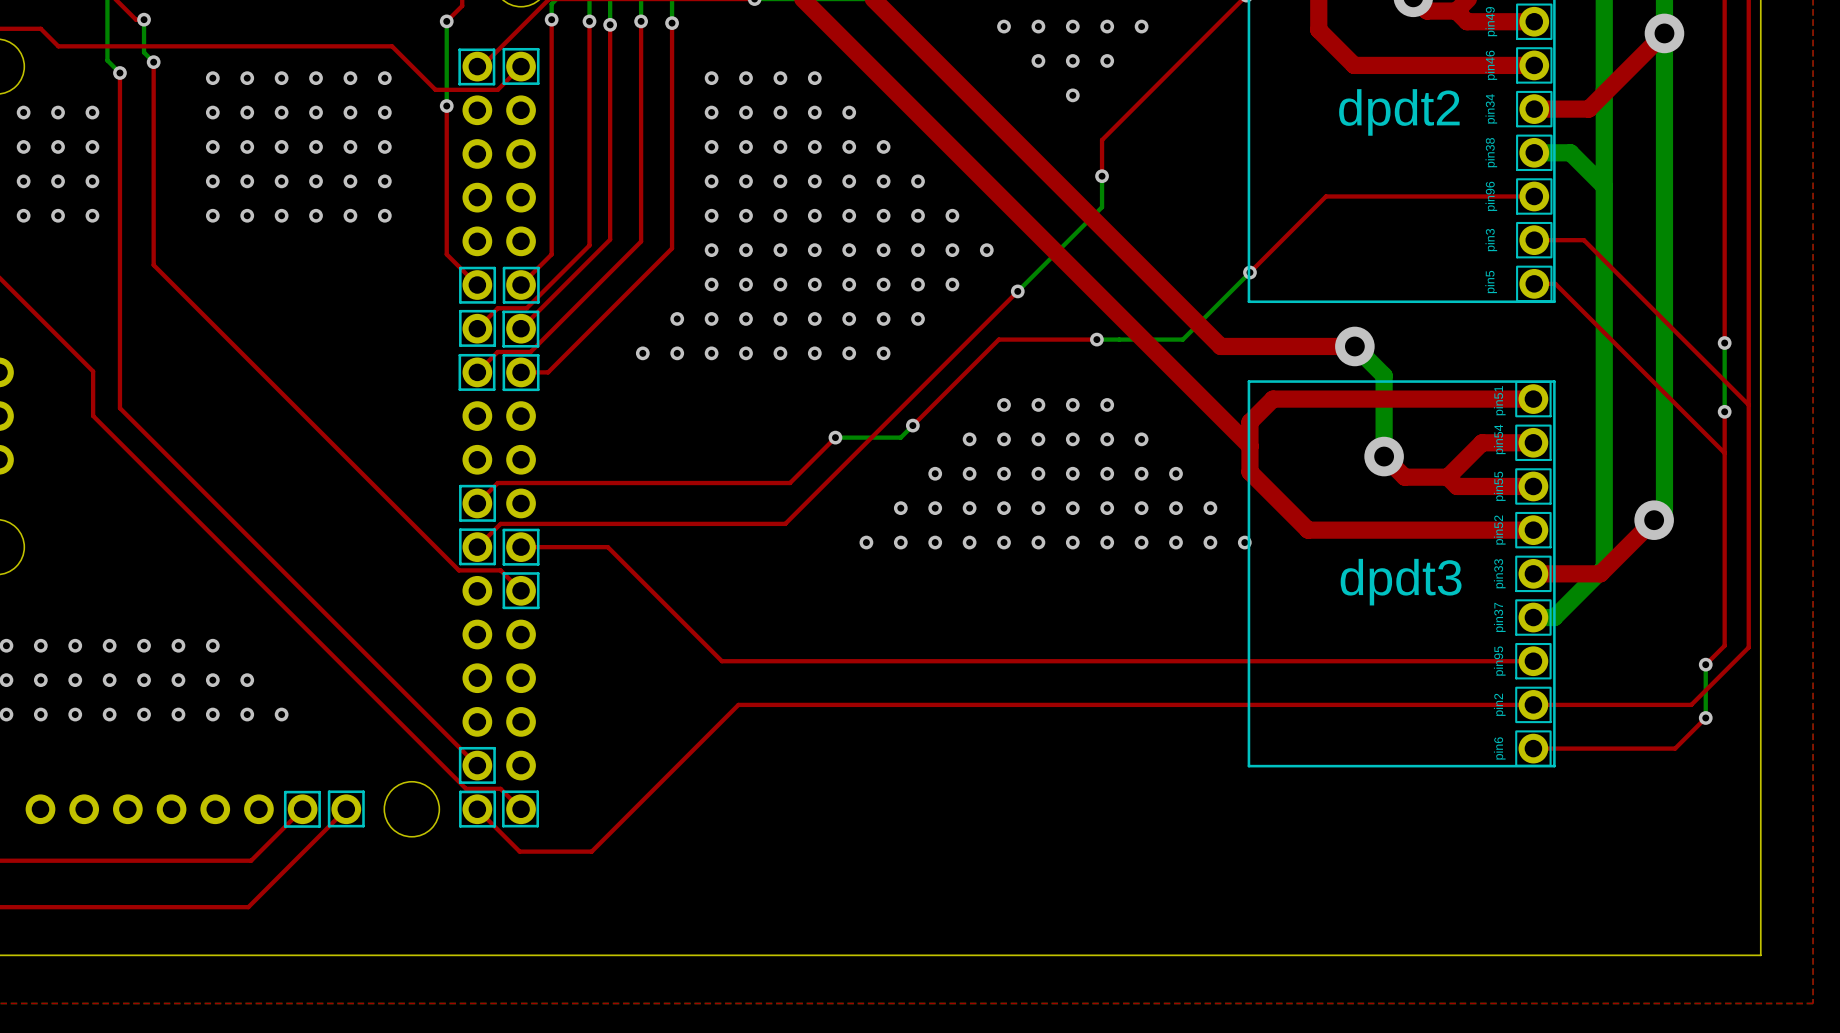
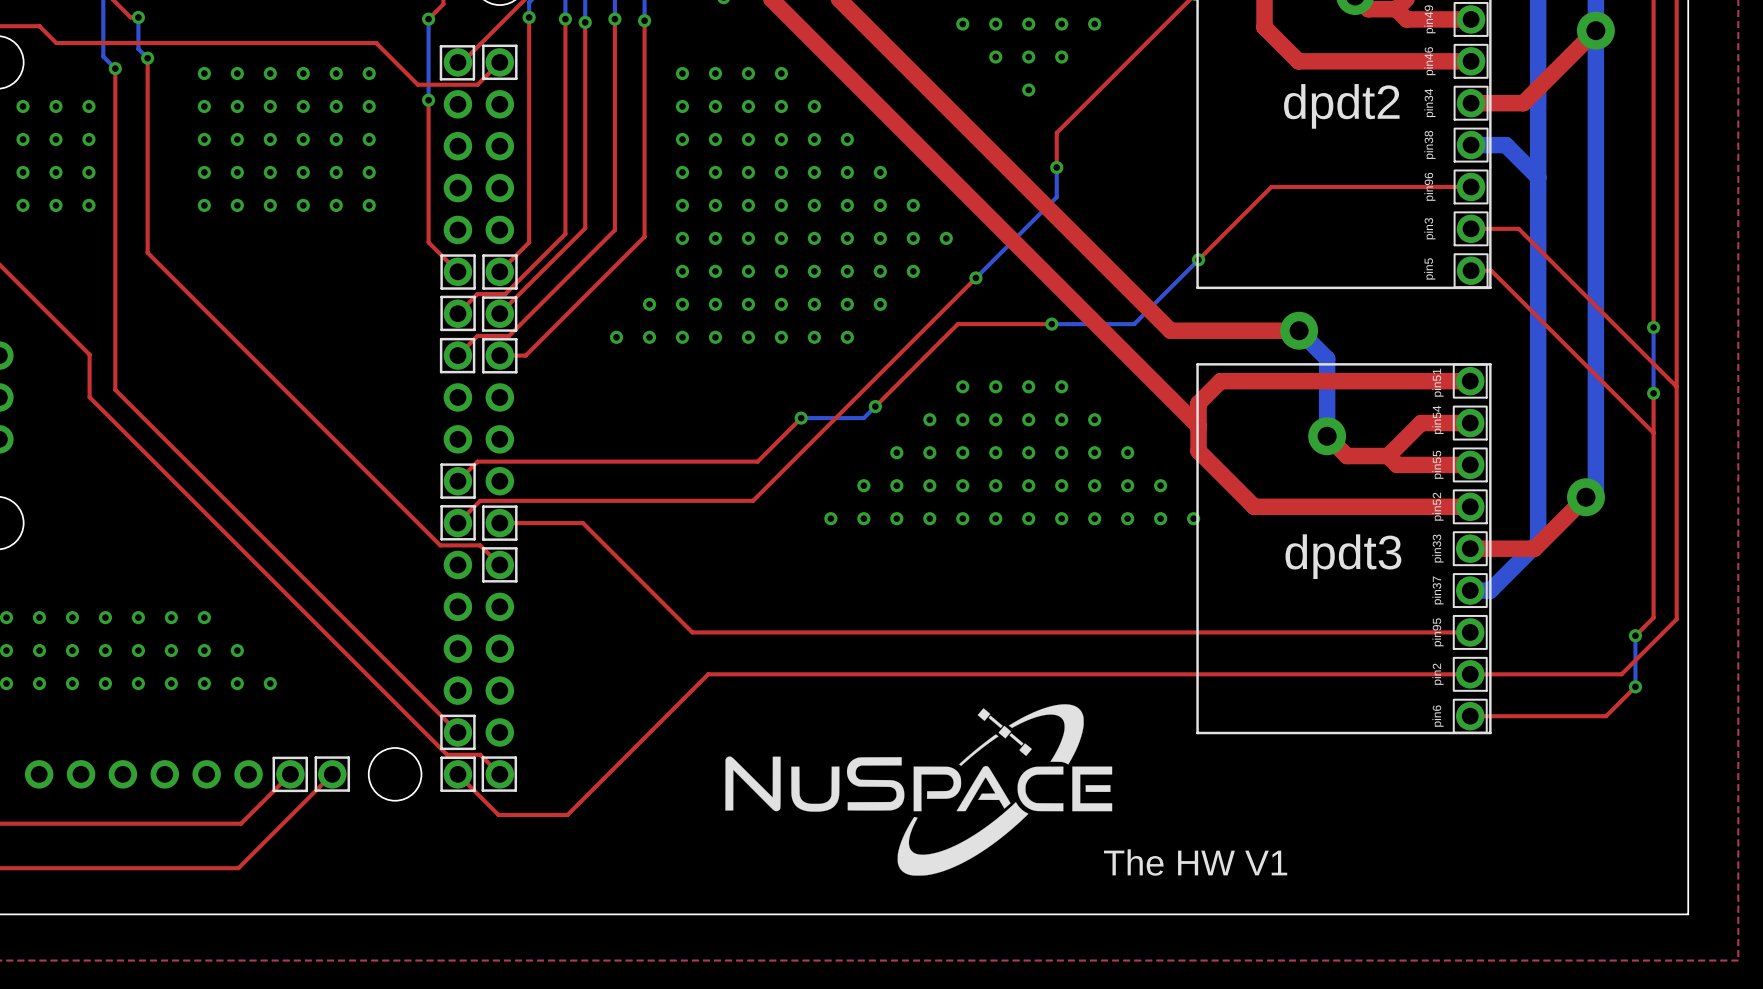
drawing: none -> [725, 704, 1113, 876]
text: none -> The HW V1 (1195, 862)

